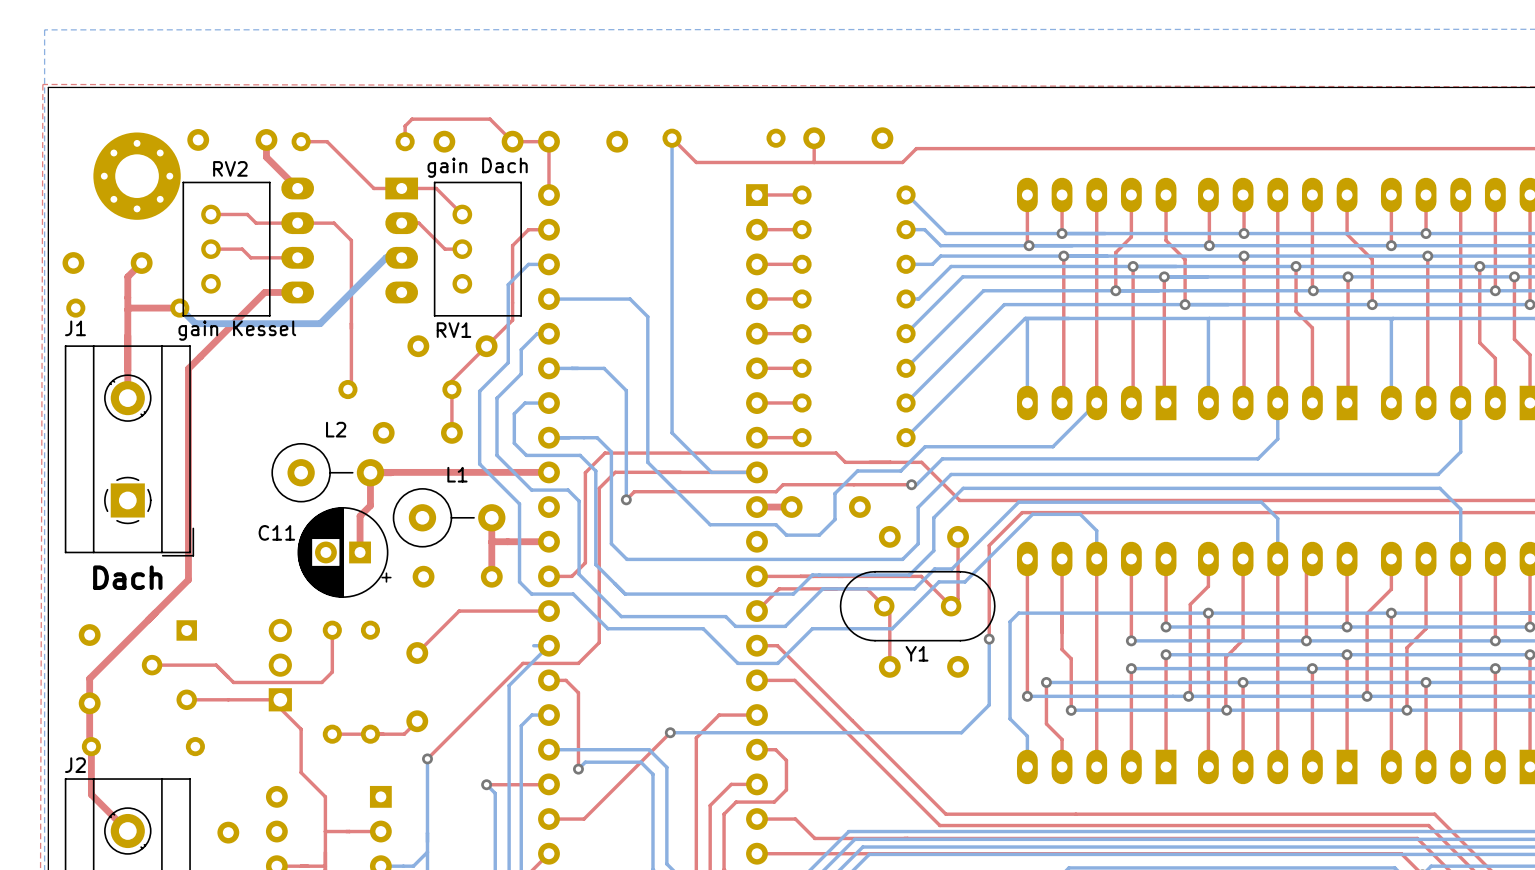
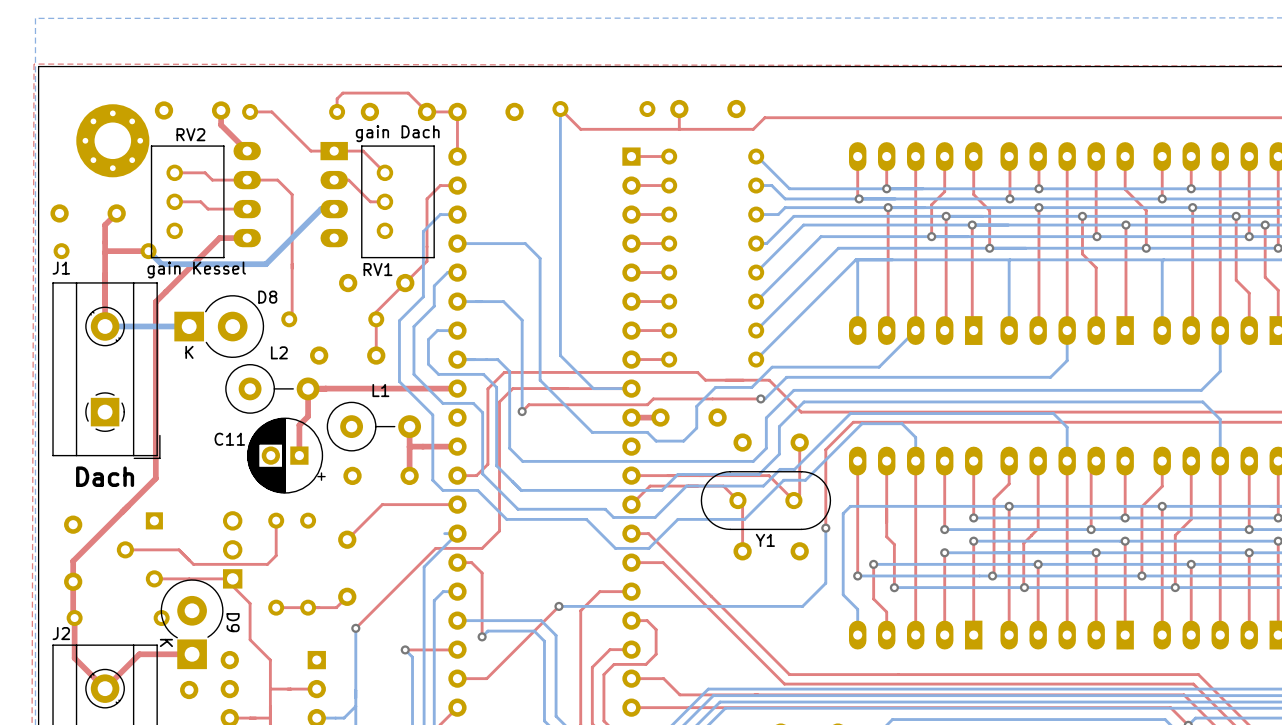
bottom track: none -> (189, 326) (105, 326)
D8: none -> (219, 326)
D9: none -> (192, 624)
top track: none -> (192, 654) (139, 654) (105, 688)

